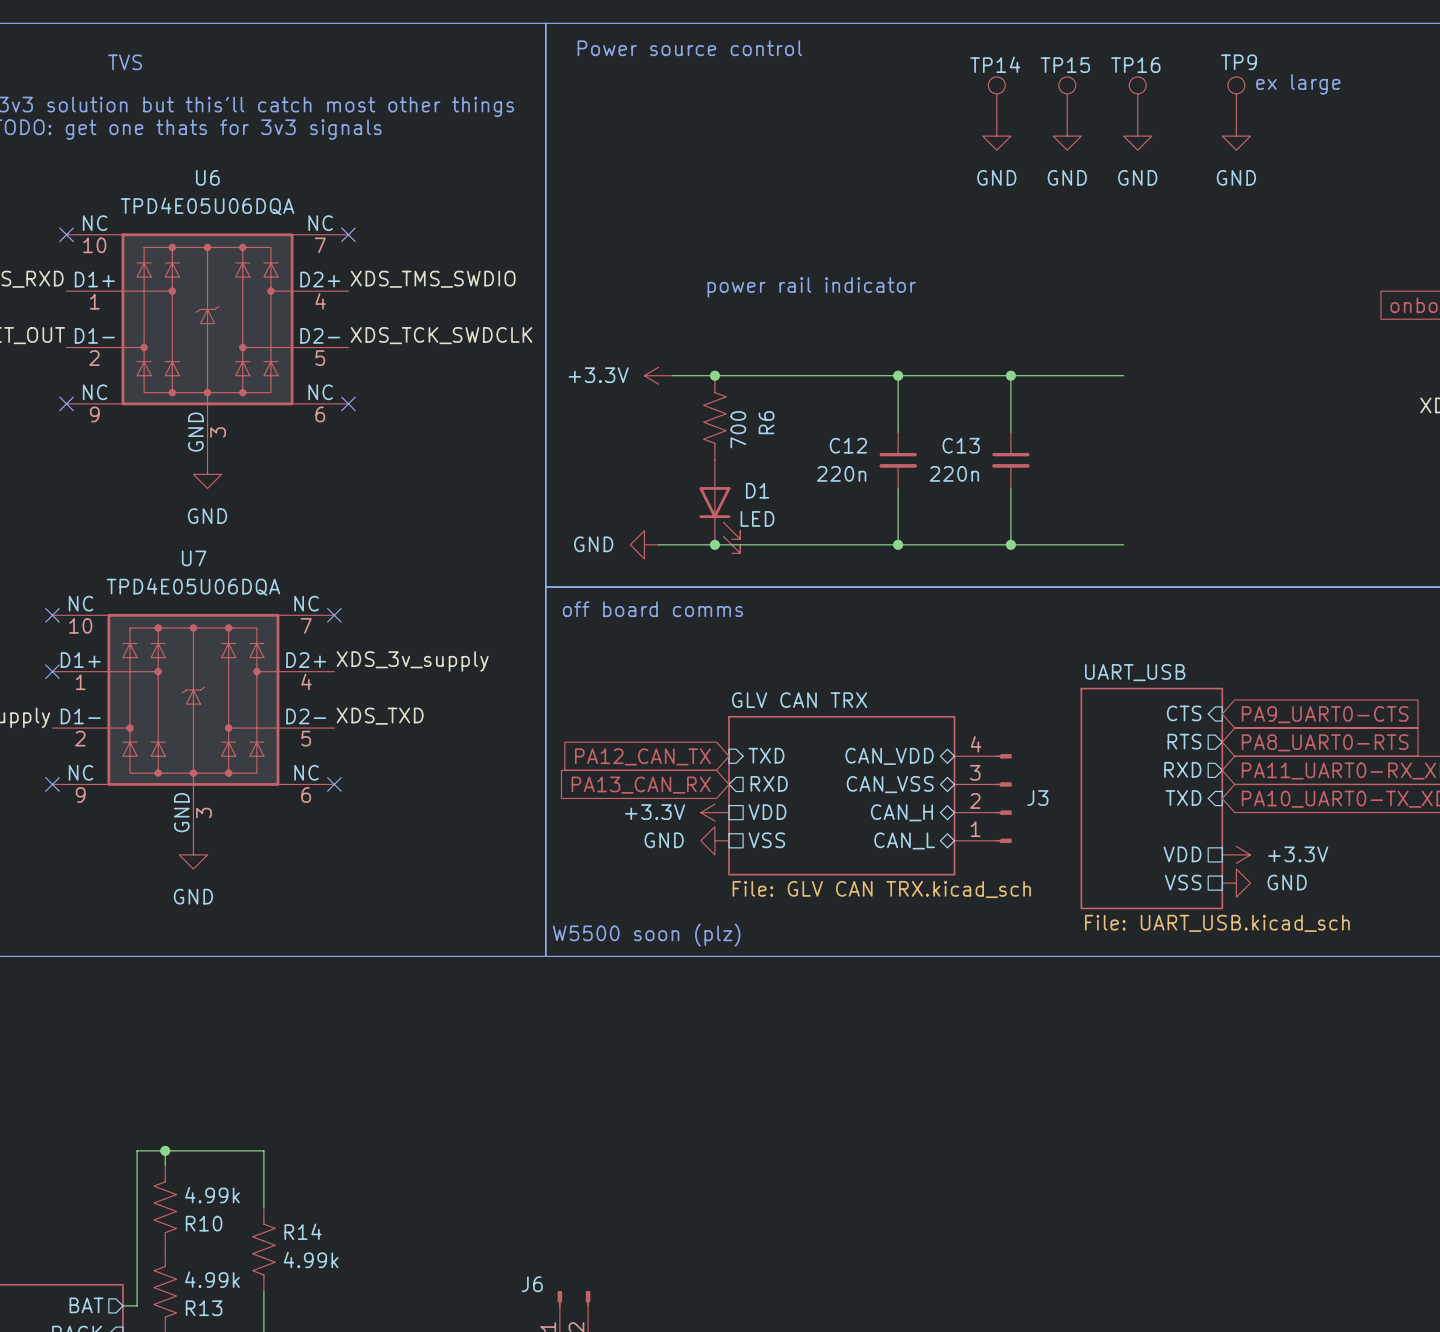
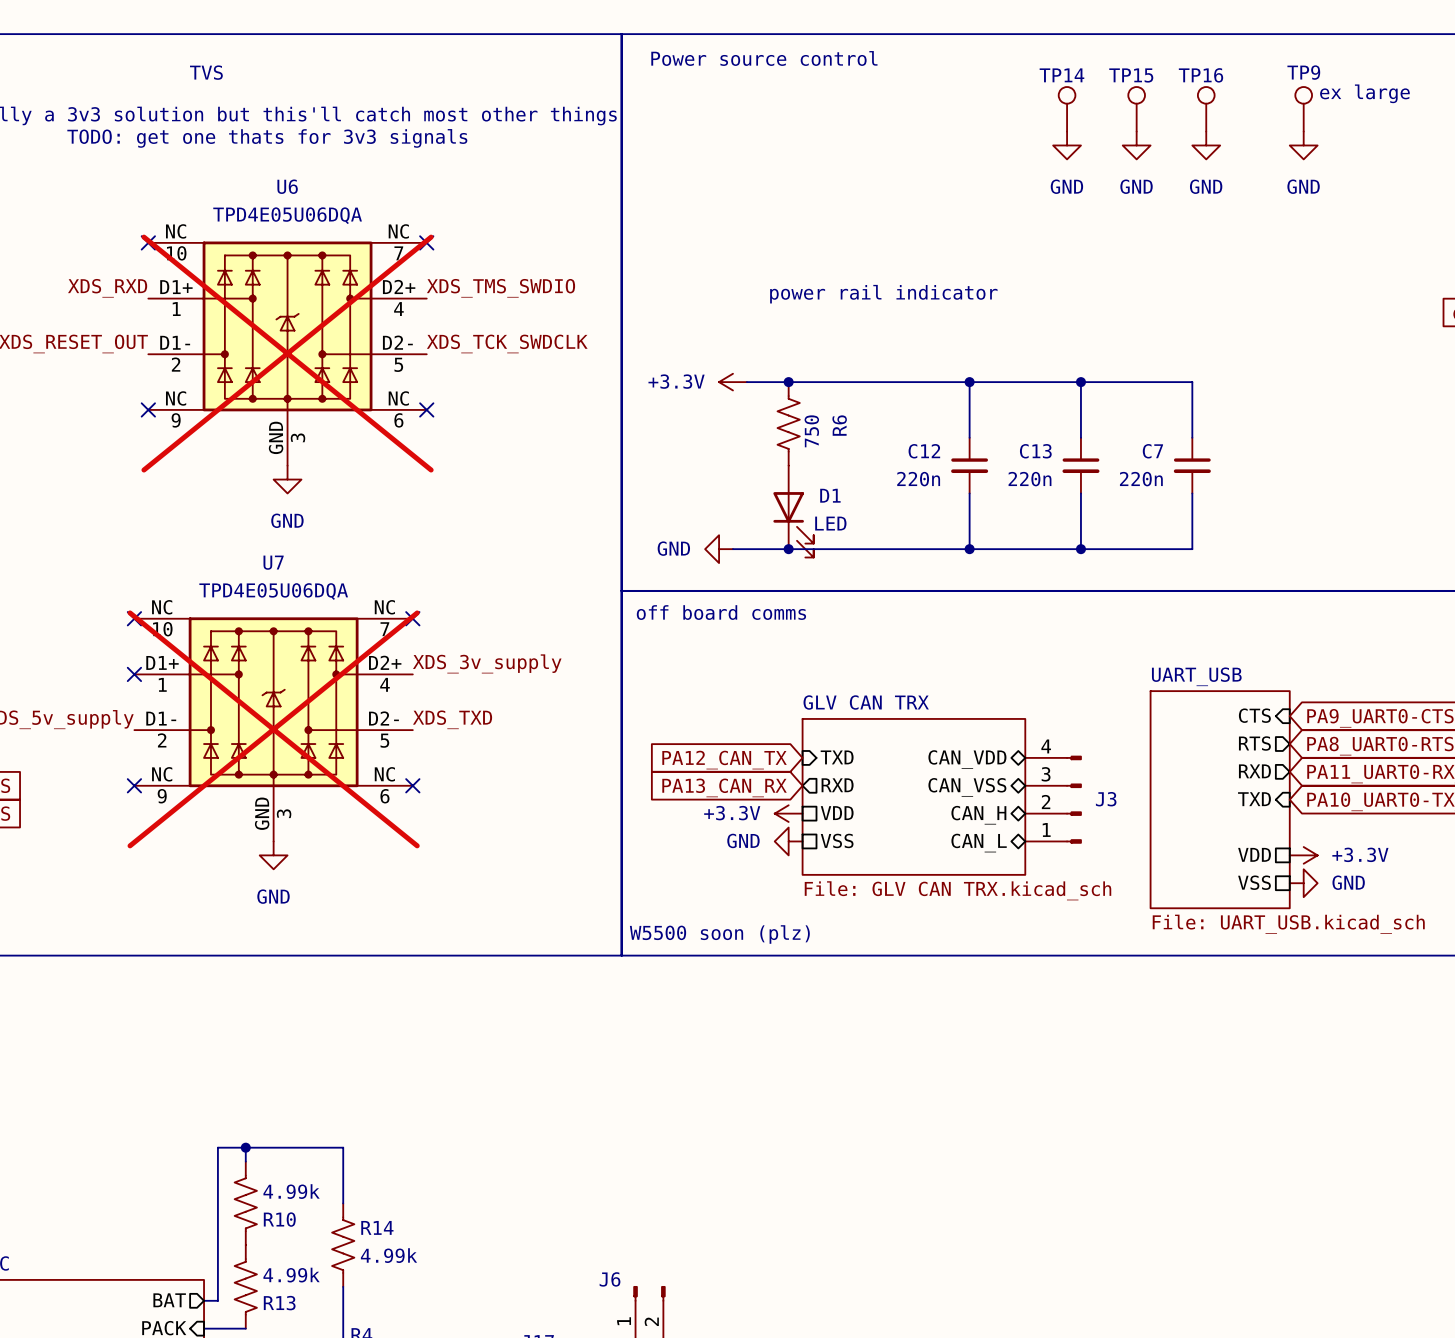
U6 do-not-place cross: none -> (287, 353)
wire: none -> (1192, 382) (1192, 437)
R6 value: 700 (738, 429) -> 750 (811, 431)
C7: none -> 220n (1192, 465)
wire: none -> (1192, 493) (1192, 549)
U7 do-not-place cross: none -> (273, 729)

